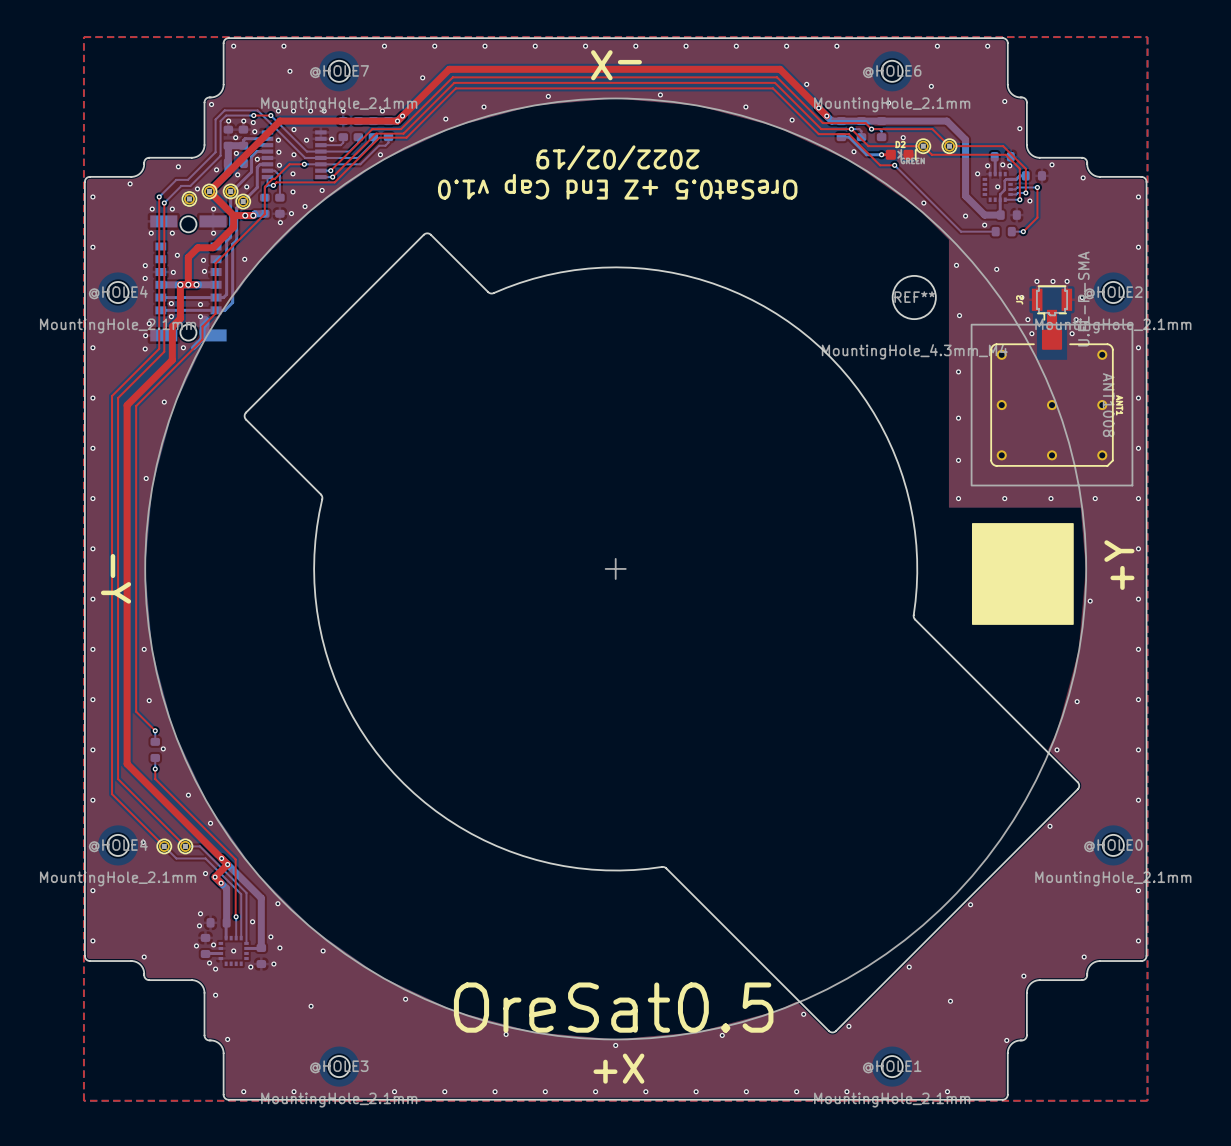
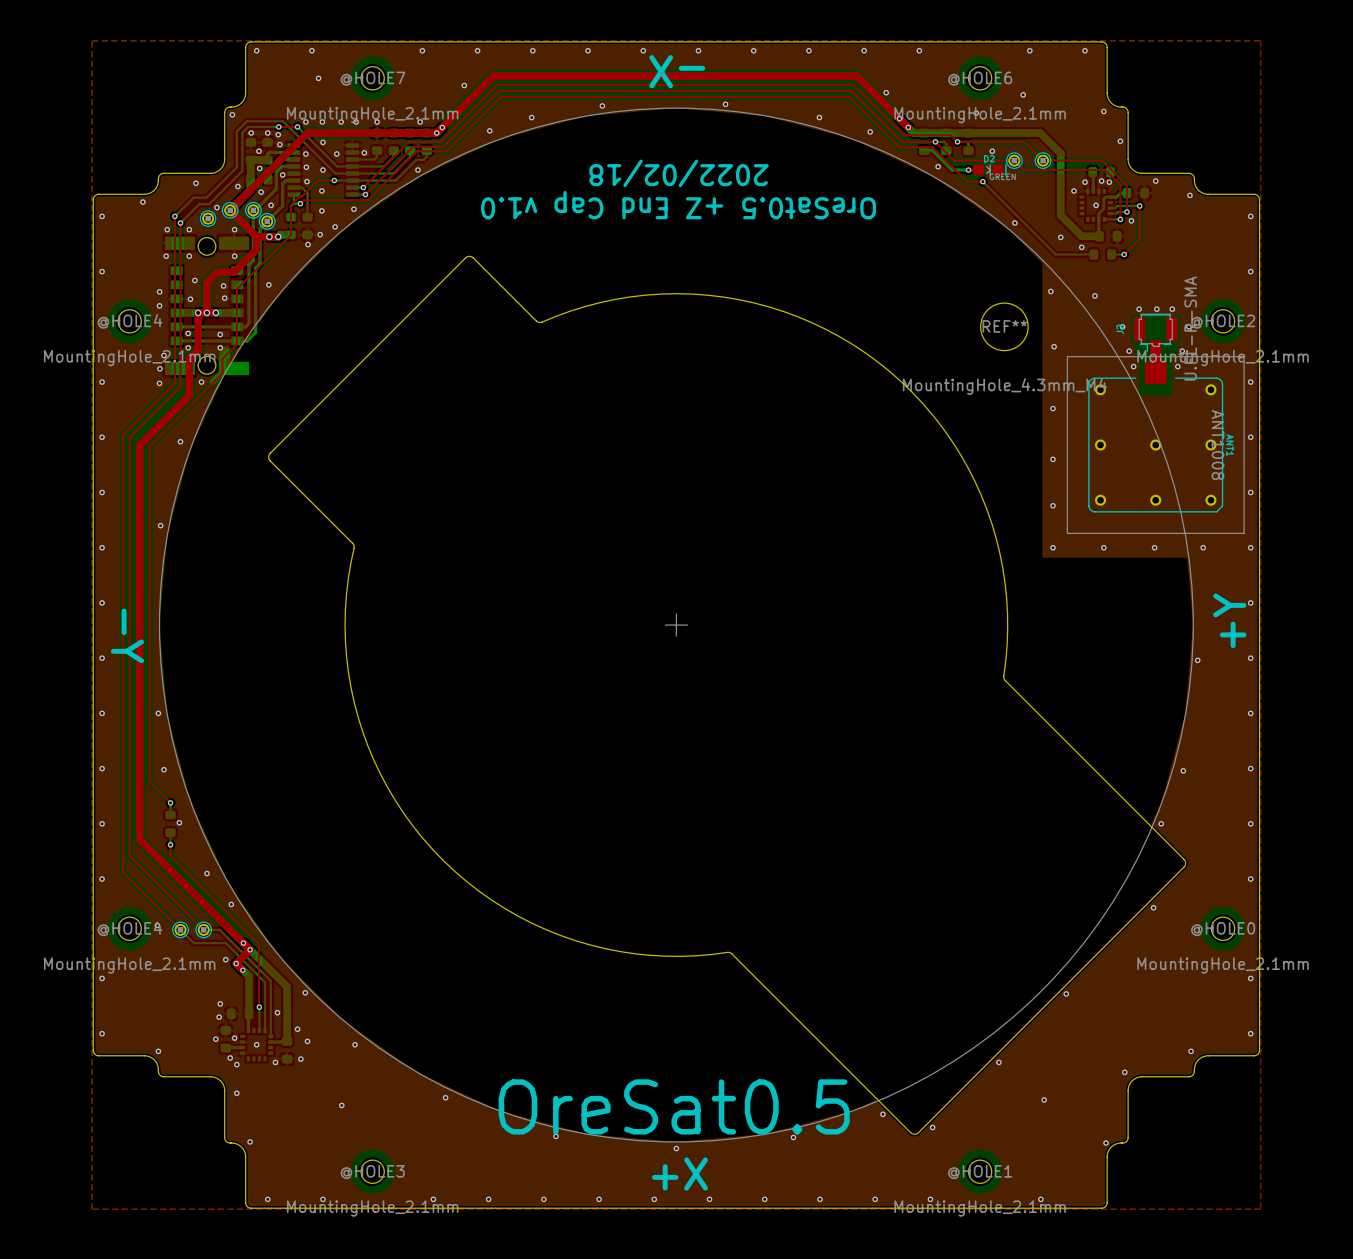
text: 2022/02/19 (618, 157) -> 2022/02/18 (679, 173)
drawing: [971, 523, 1074, 625] -> none

